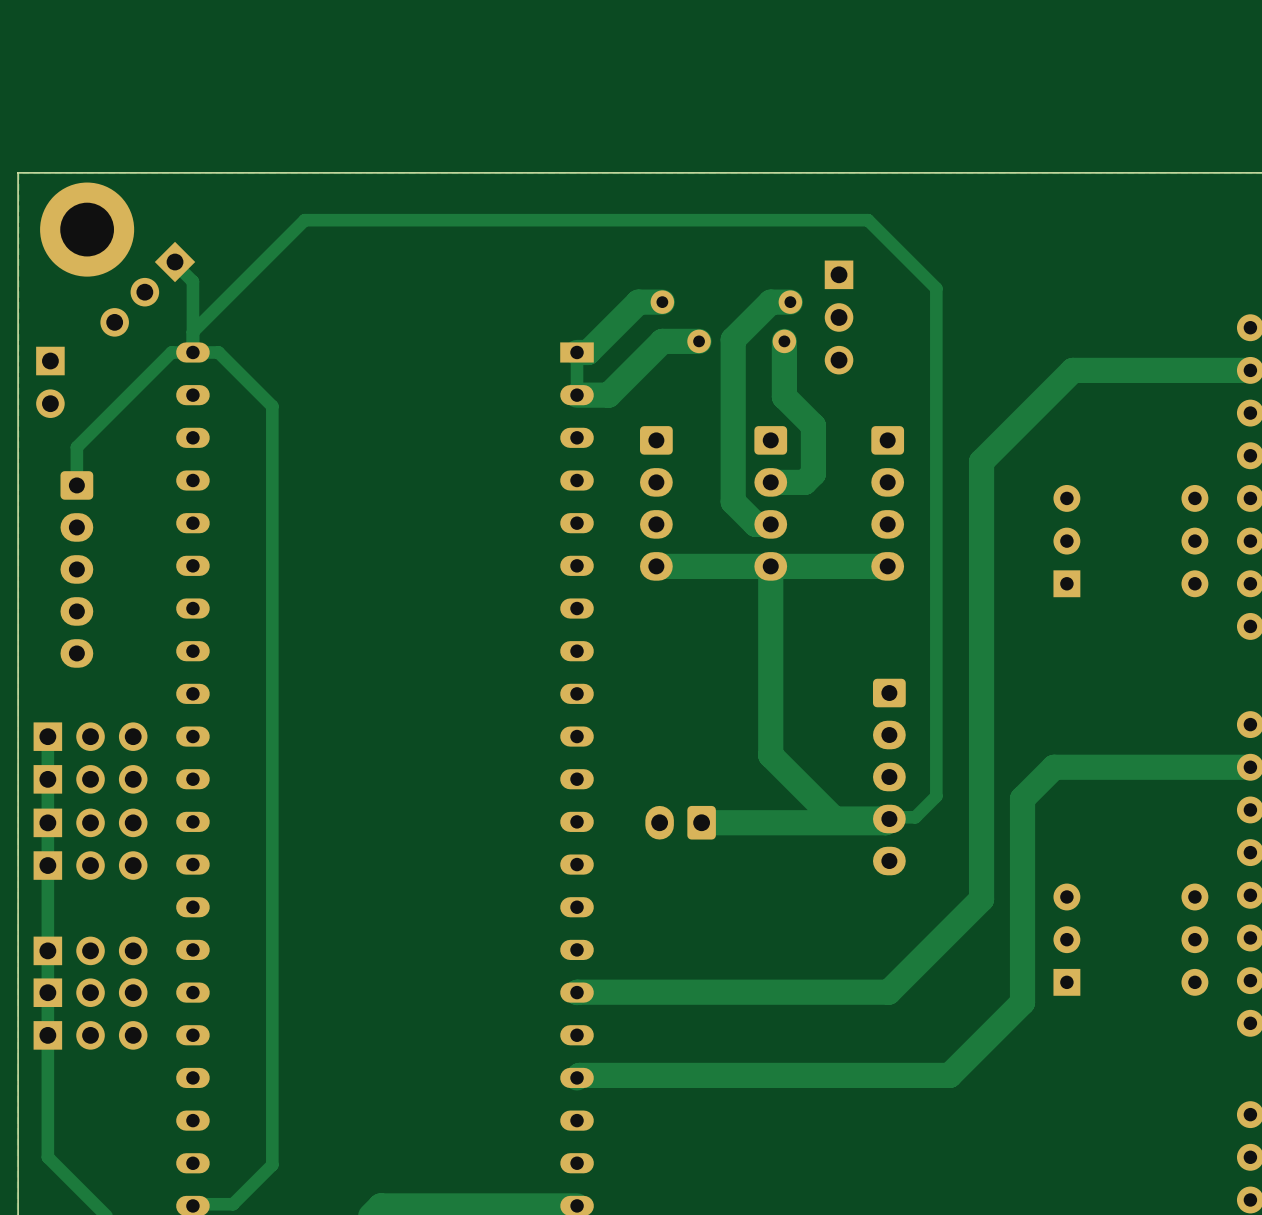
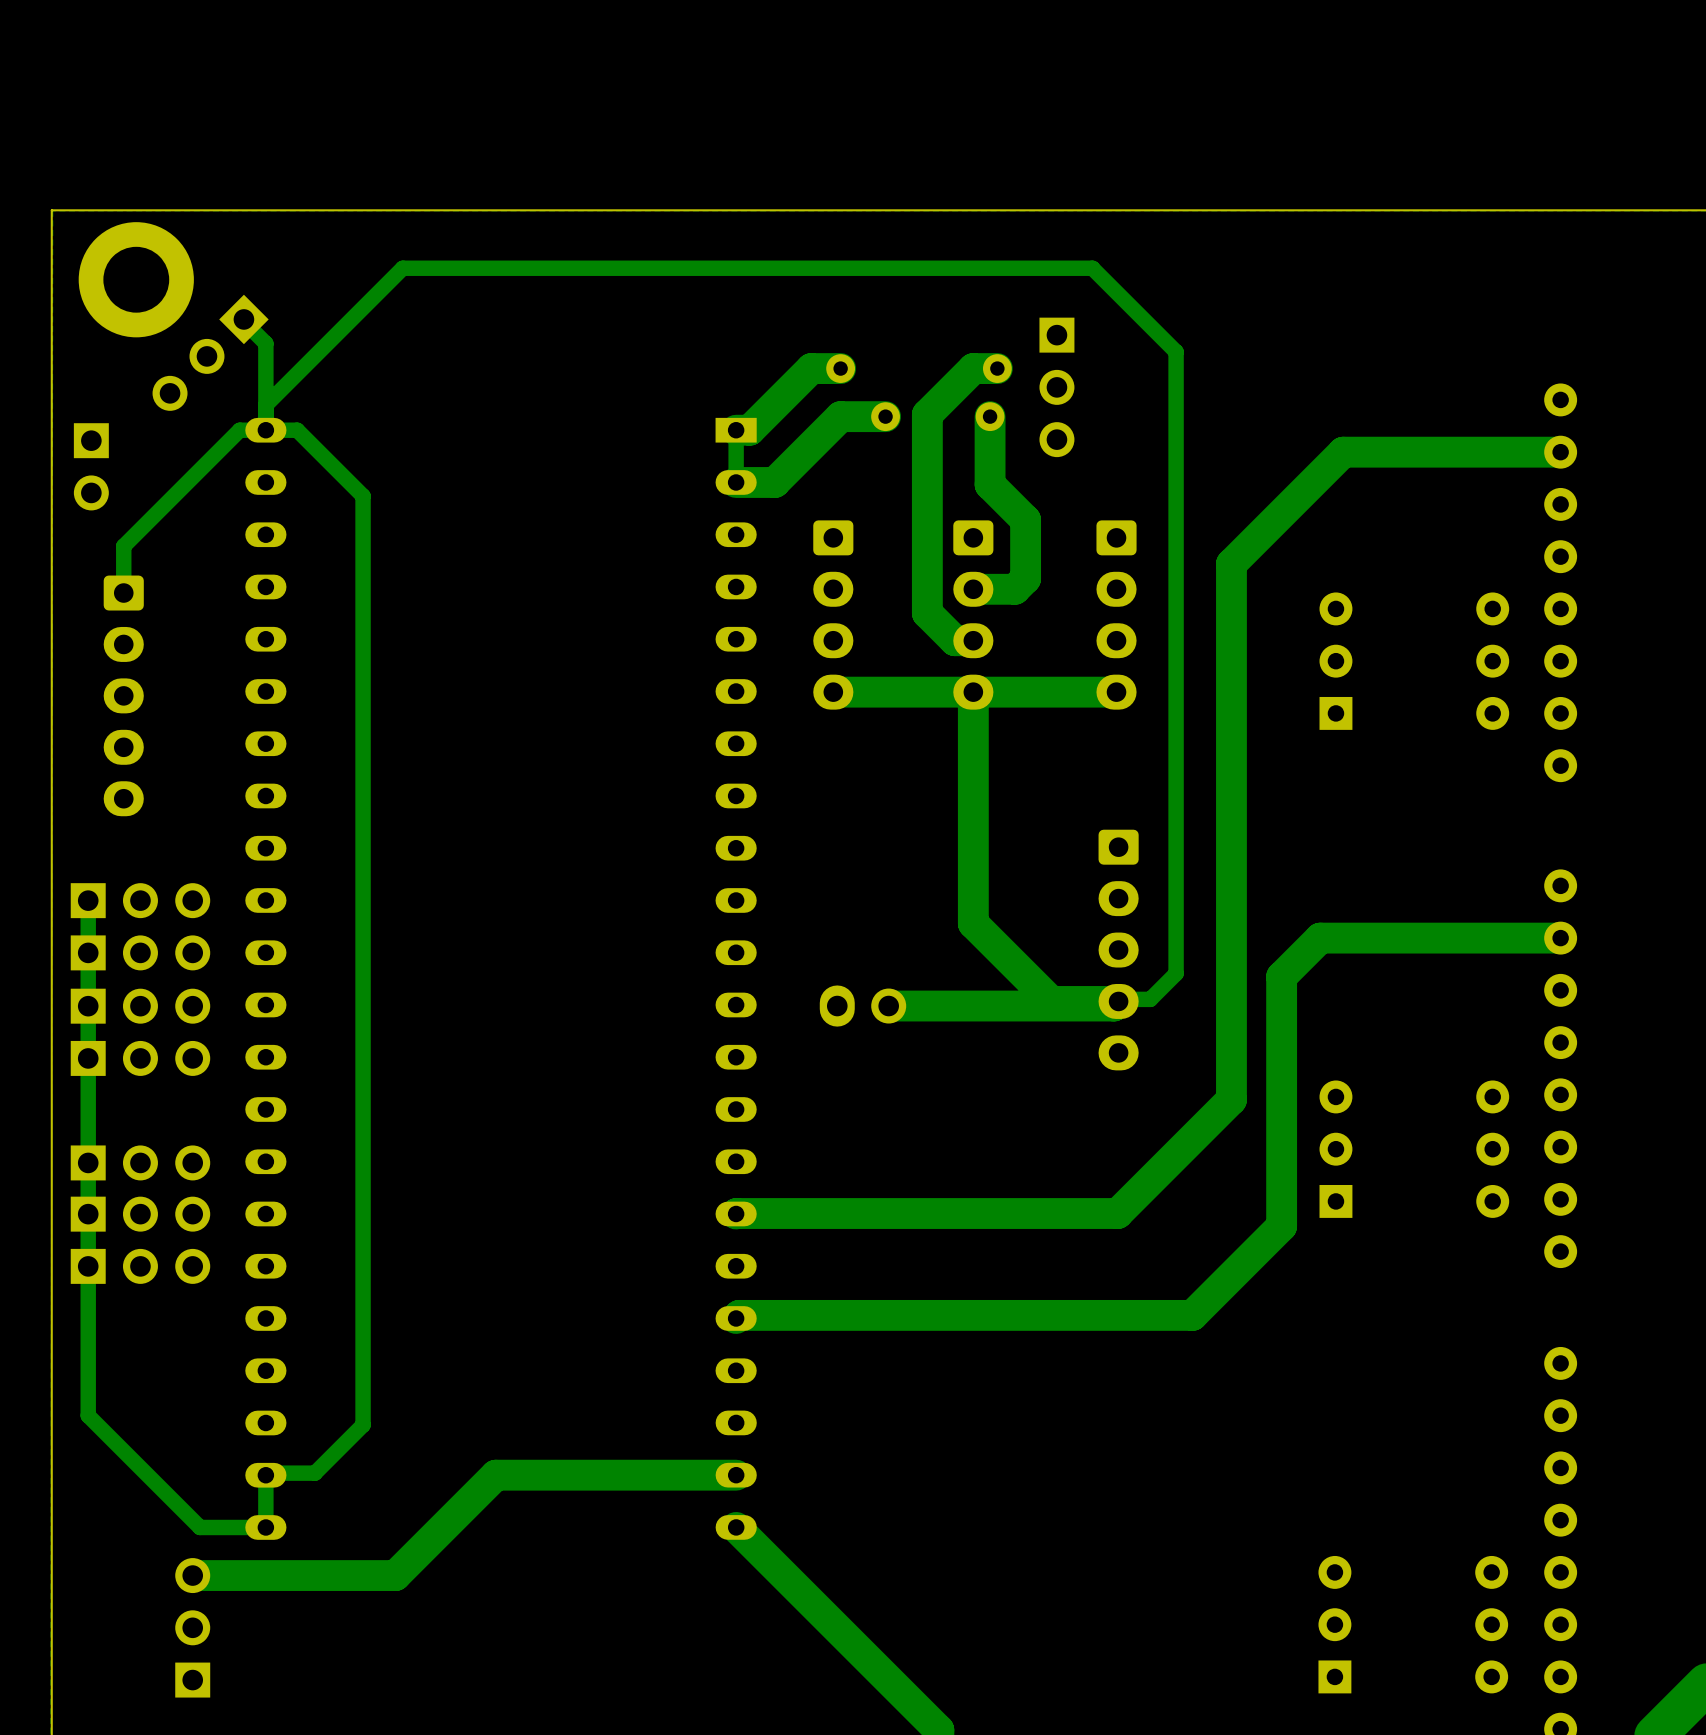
part footprint: [645, 805, 716, 840] -> [819, 985, 907, 1027]

